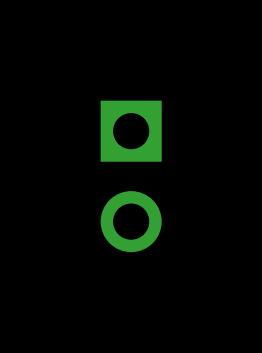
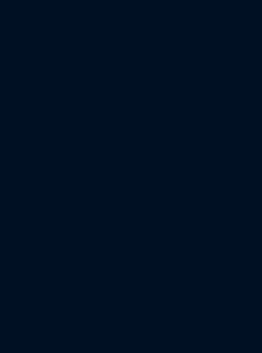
part: (131, 176) -> none

